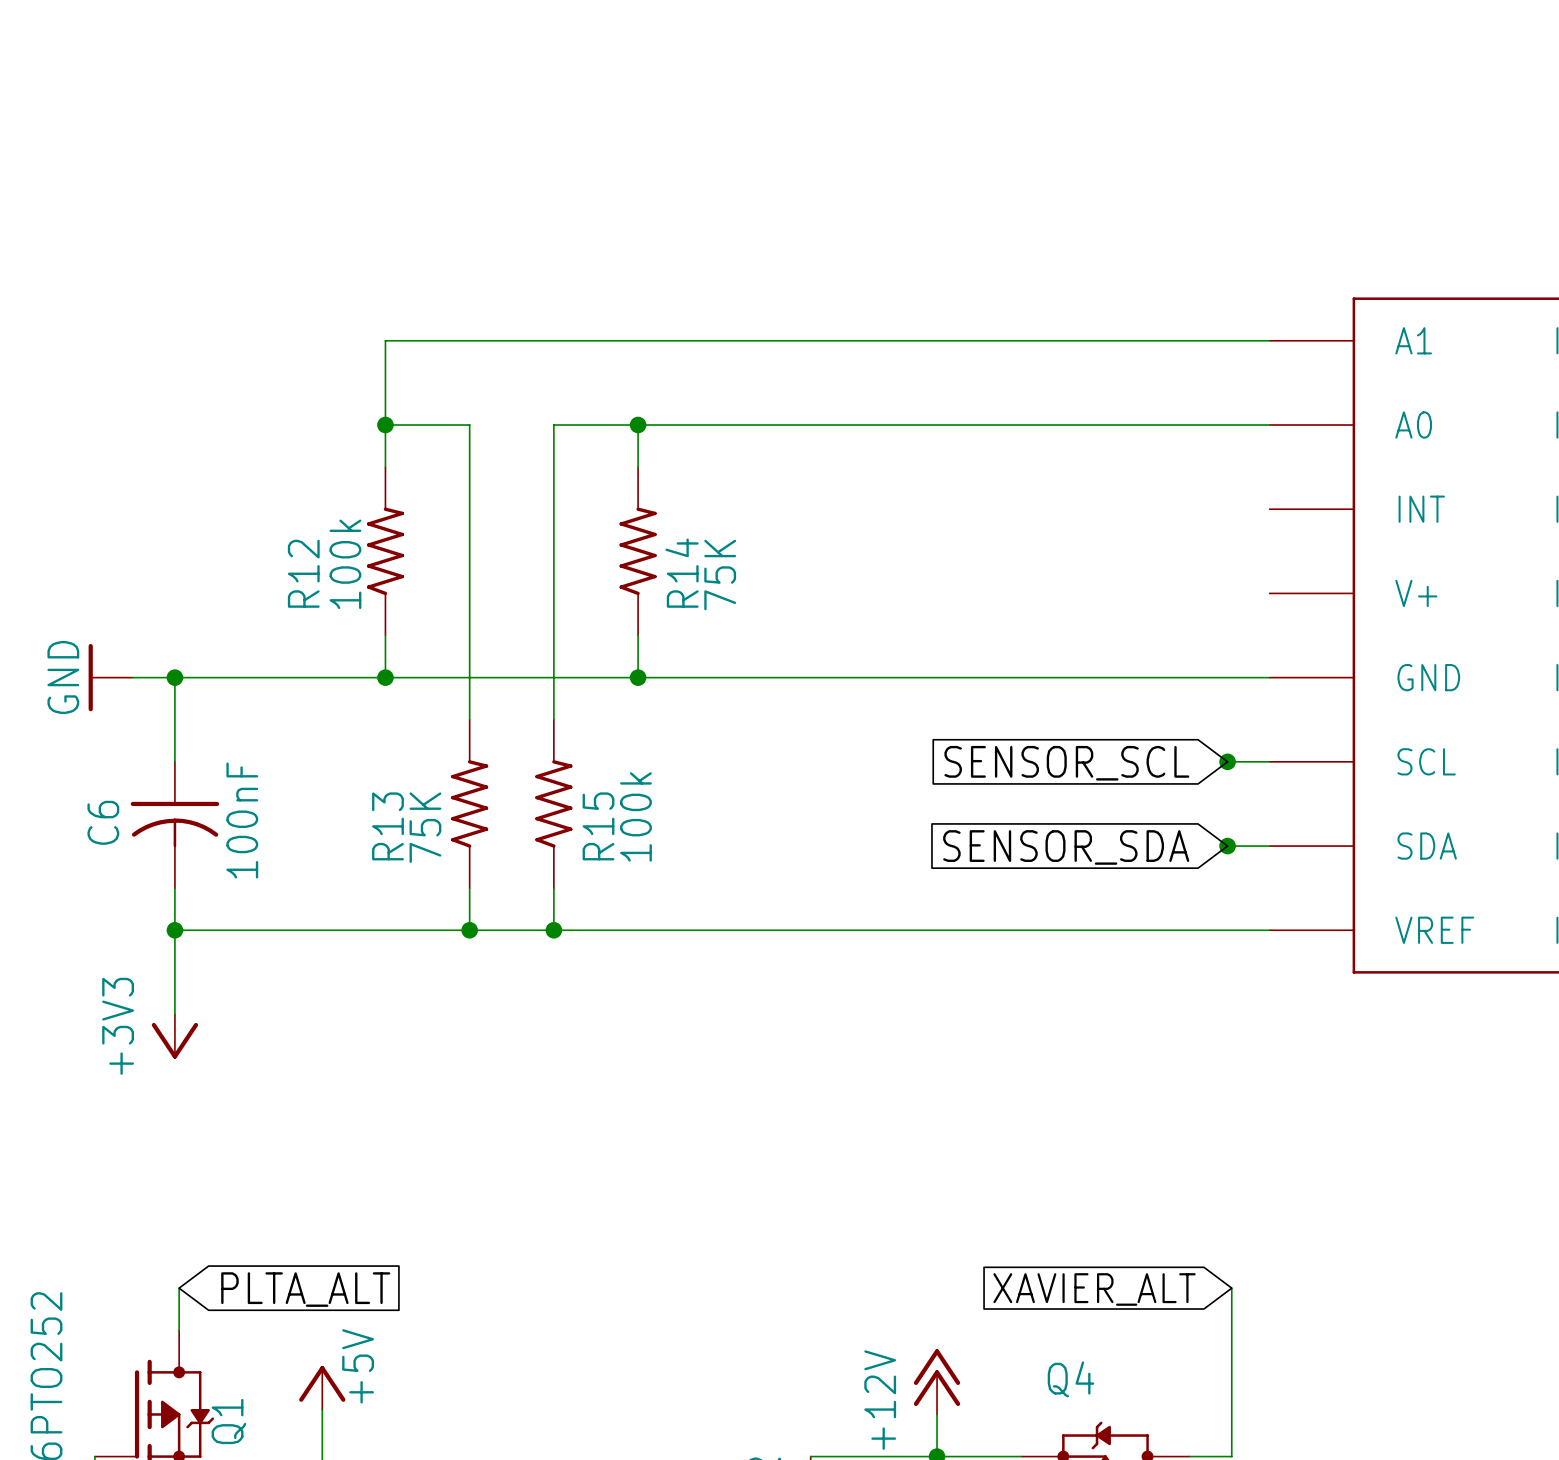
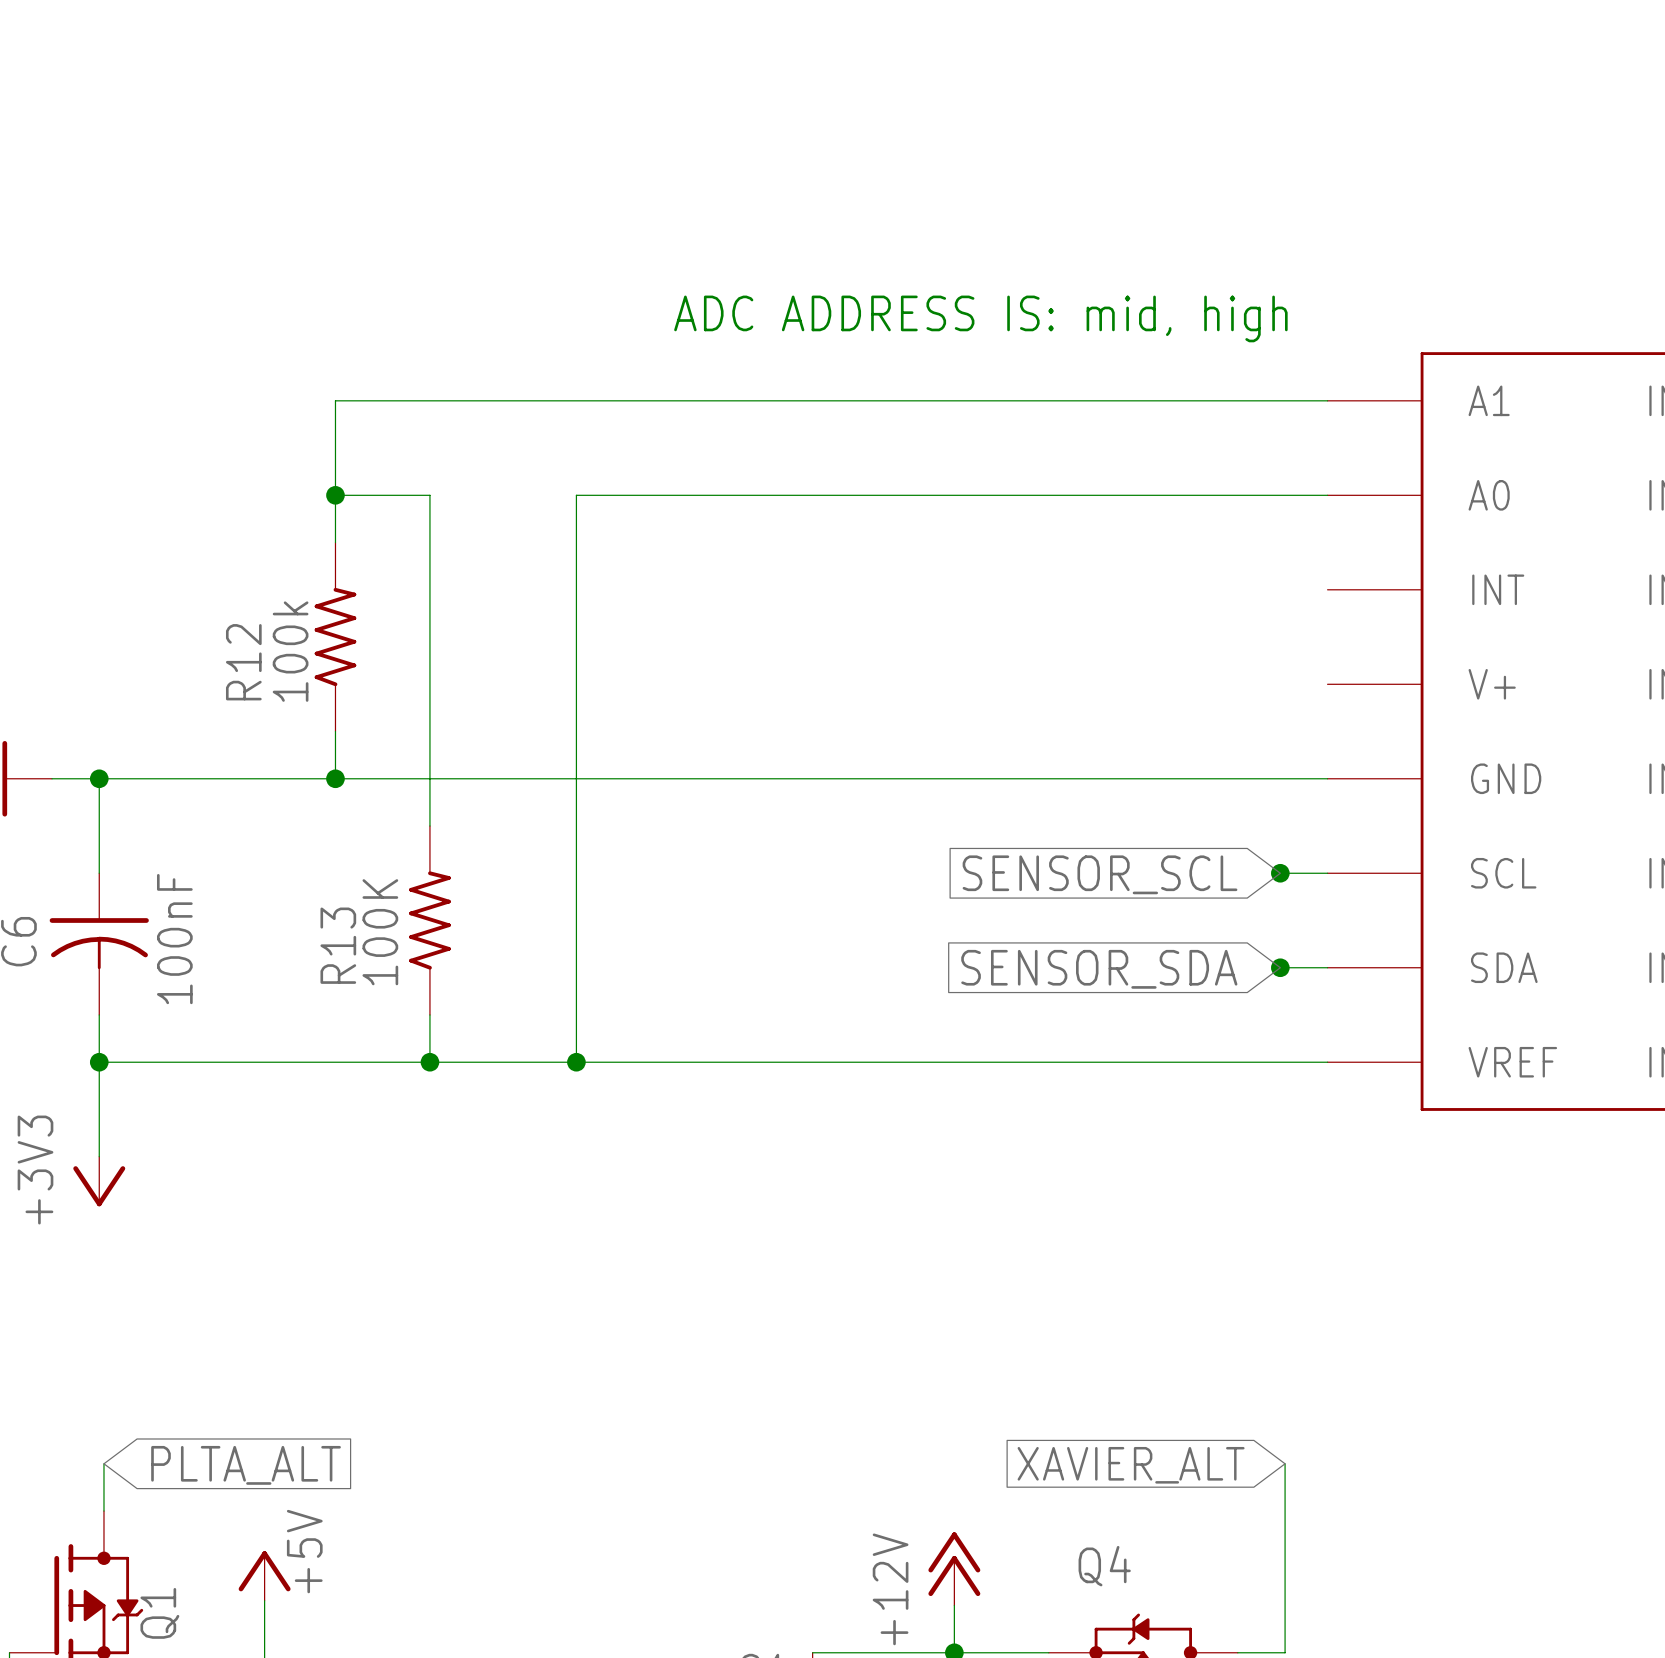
text: none -> ADC ADDRESS IS: mid, high (980, 318)
wire: (600, 425) (553, 425) (553, 719) -> (576, 495) (576, 1062)
wire: (638, 425) (638, 467) -> none
junction: (638, 425) -> none
R14: 75K (638, 551) -> none
wire: (638, 635) (638, 677) -> none
junction: (638, 677) -> none
R15: 100k (553, 803) -> none
R13 value: 75K (425, 827) -> 100K (380, 932)
wire: (553, 888) (553, 930) -> none
junction position: (553, 930) -> (576, 1062)

